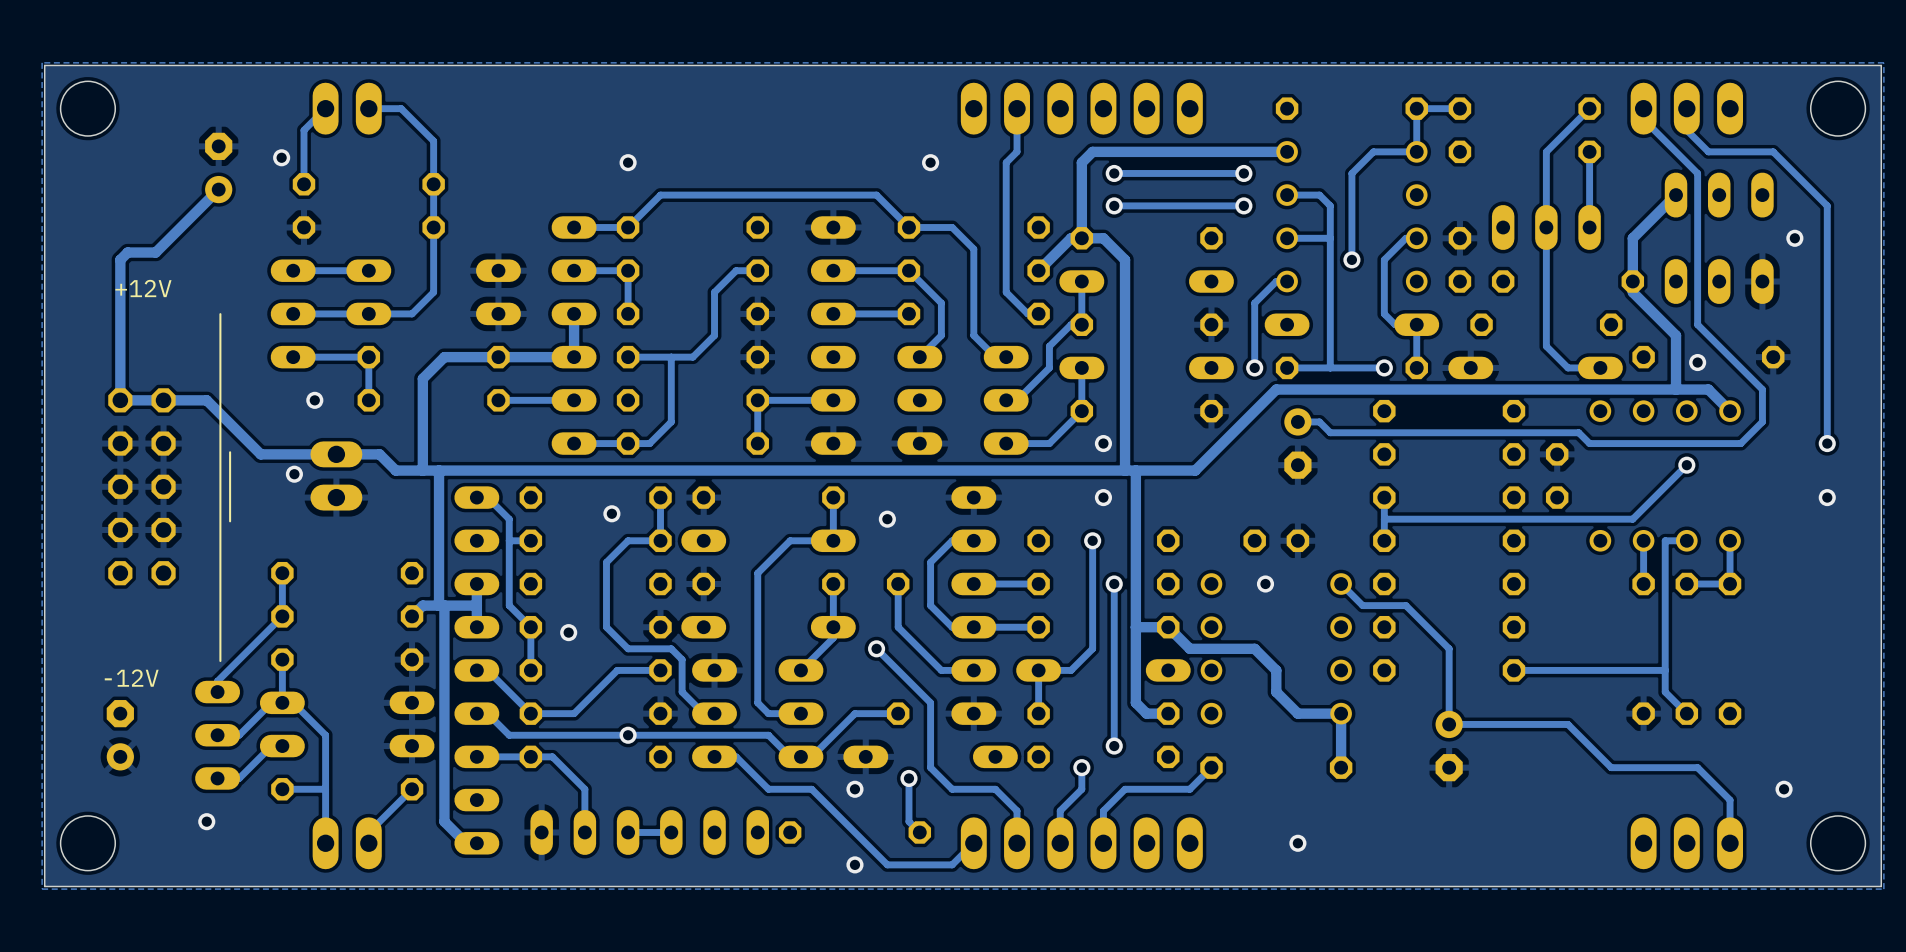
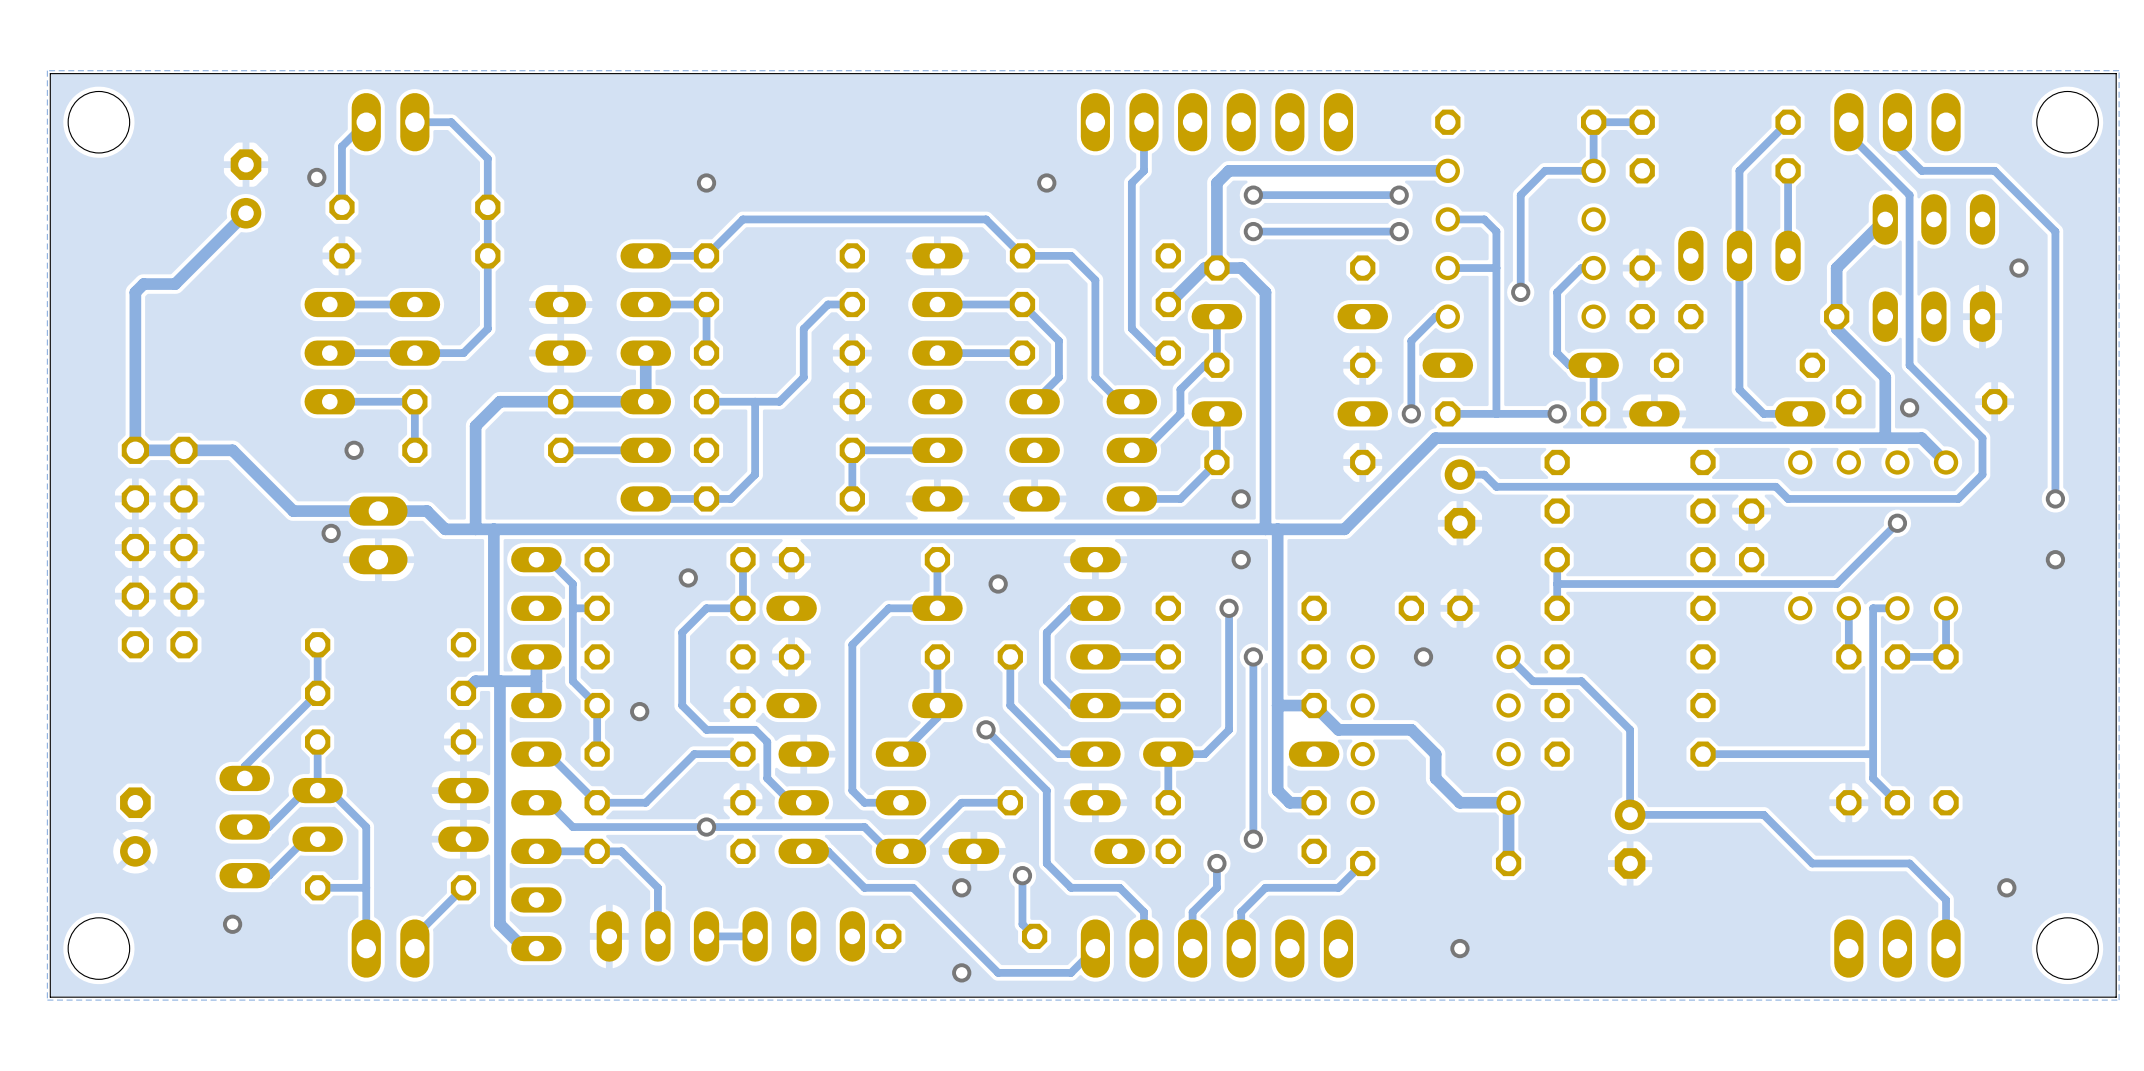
text: +12V (143, 288) -> none
line: (220, 314) (220, 661) -> none
line: (230, 452) (230, 521) -> none
text: -12V (131, 678) -> none

